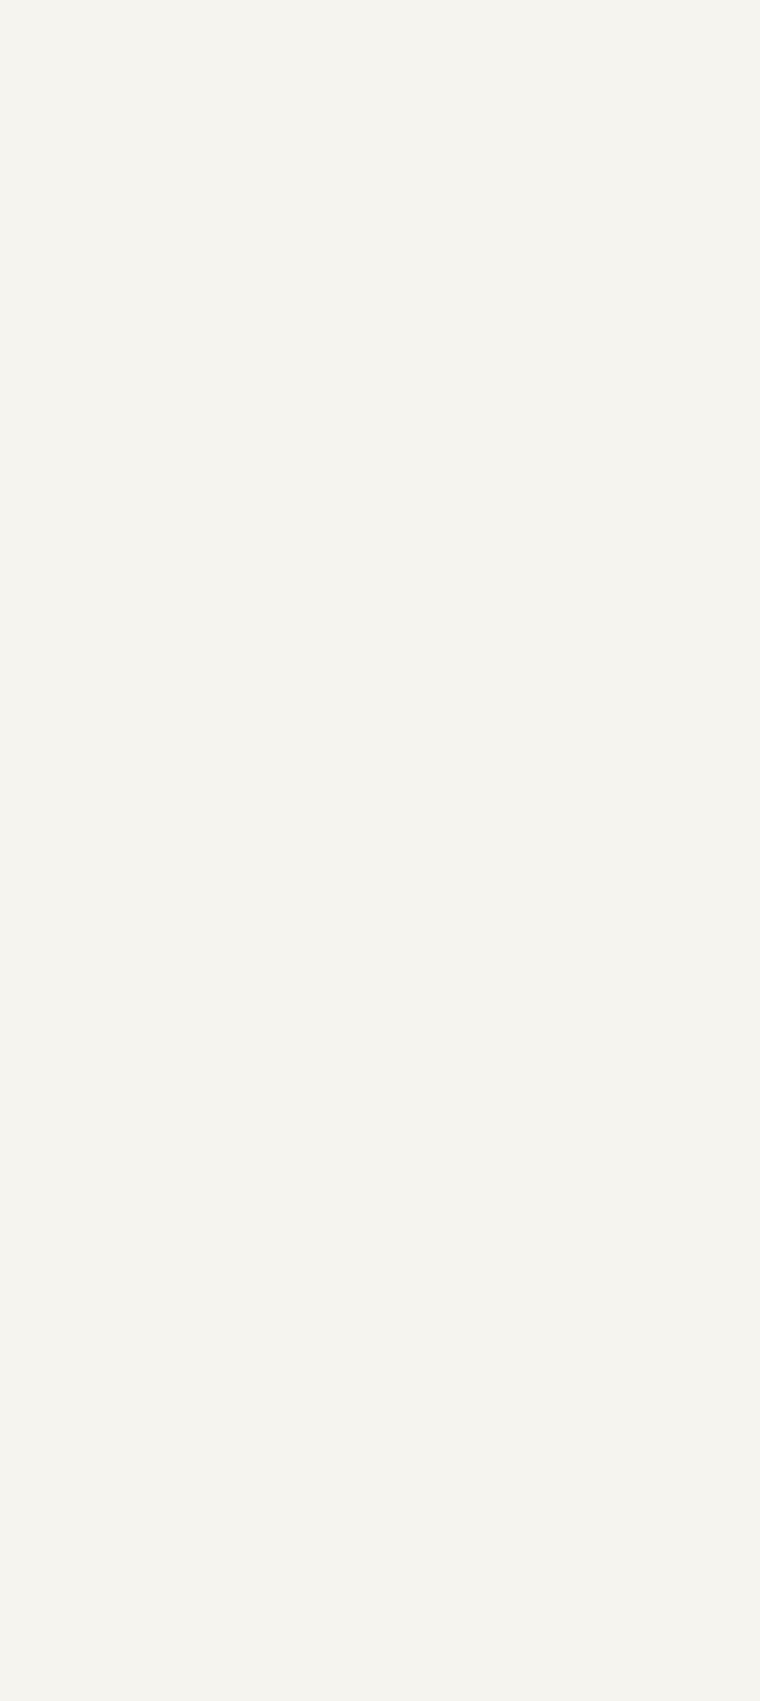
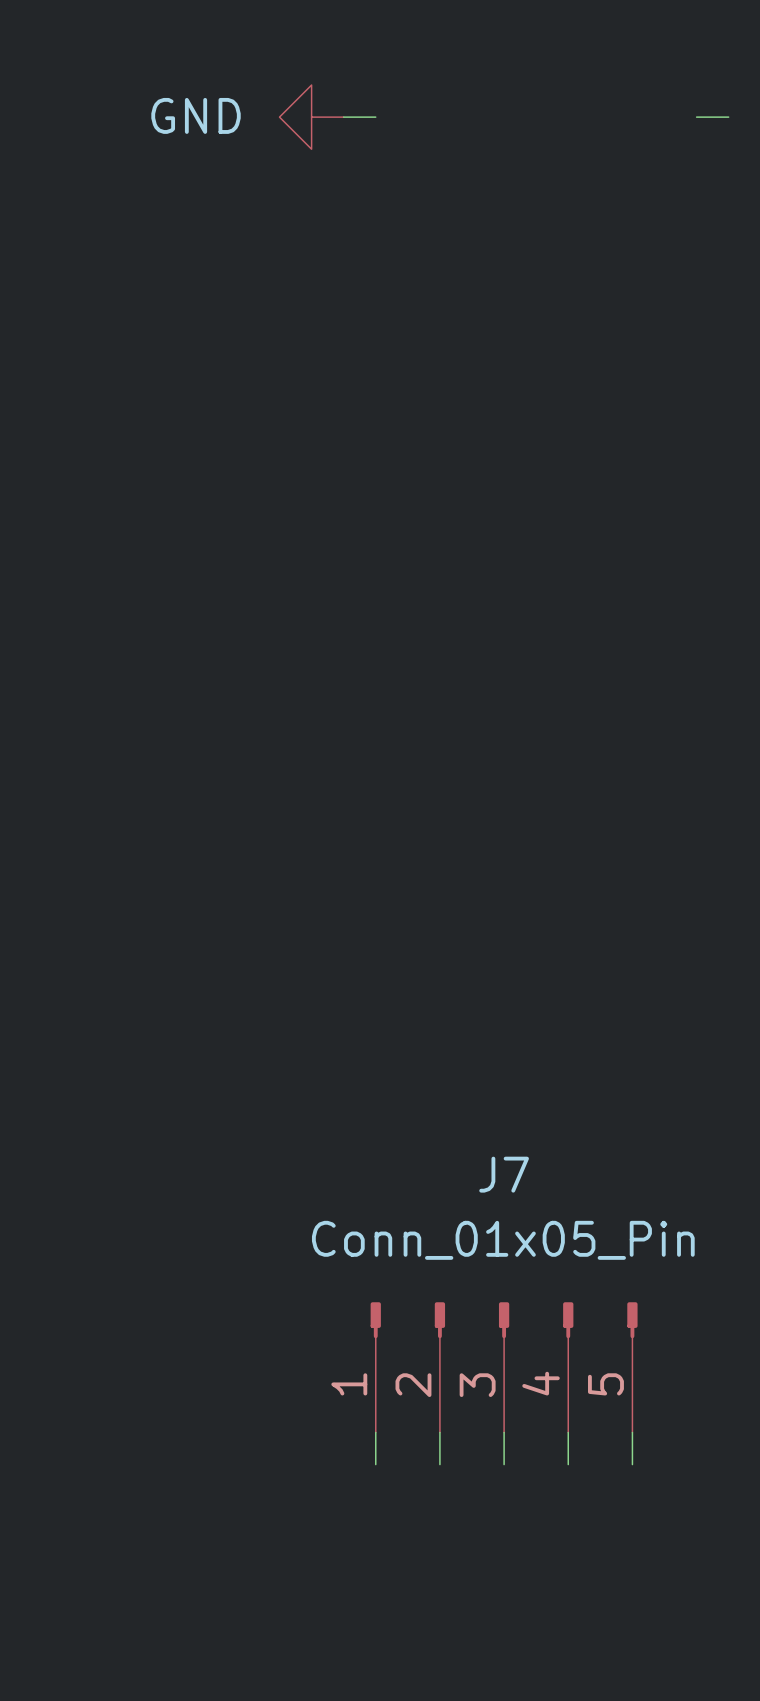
power symbol: none -> GND (311, 117)
wire: none -> (343, 117) (375, 117)
wire: none -> (696, 117) (728, 117)
J7: none -> Conn_01x05_Pin (504, 1367)
wire: none -> (375, 1432) (375, 1464)
wire: none -> (439, 1432) (439, 1464)
wire: none -> (504, 1432) (504, 1464)
wire: none -> (568, 1432) (568, 1464)
wire: none -> (632, 1432) (632, 1464)

